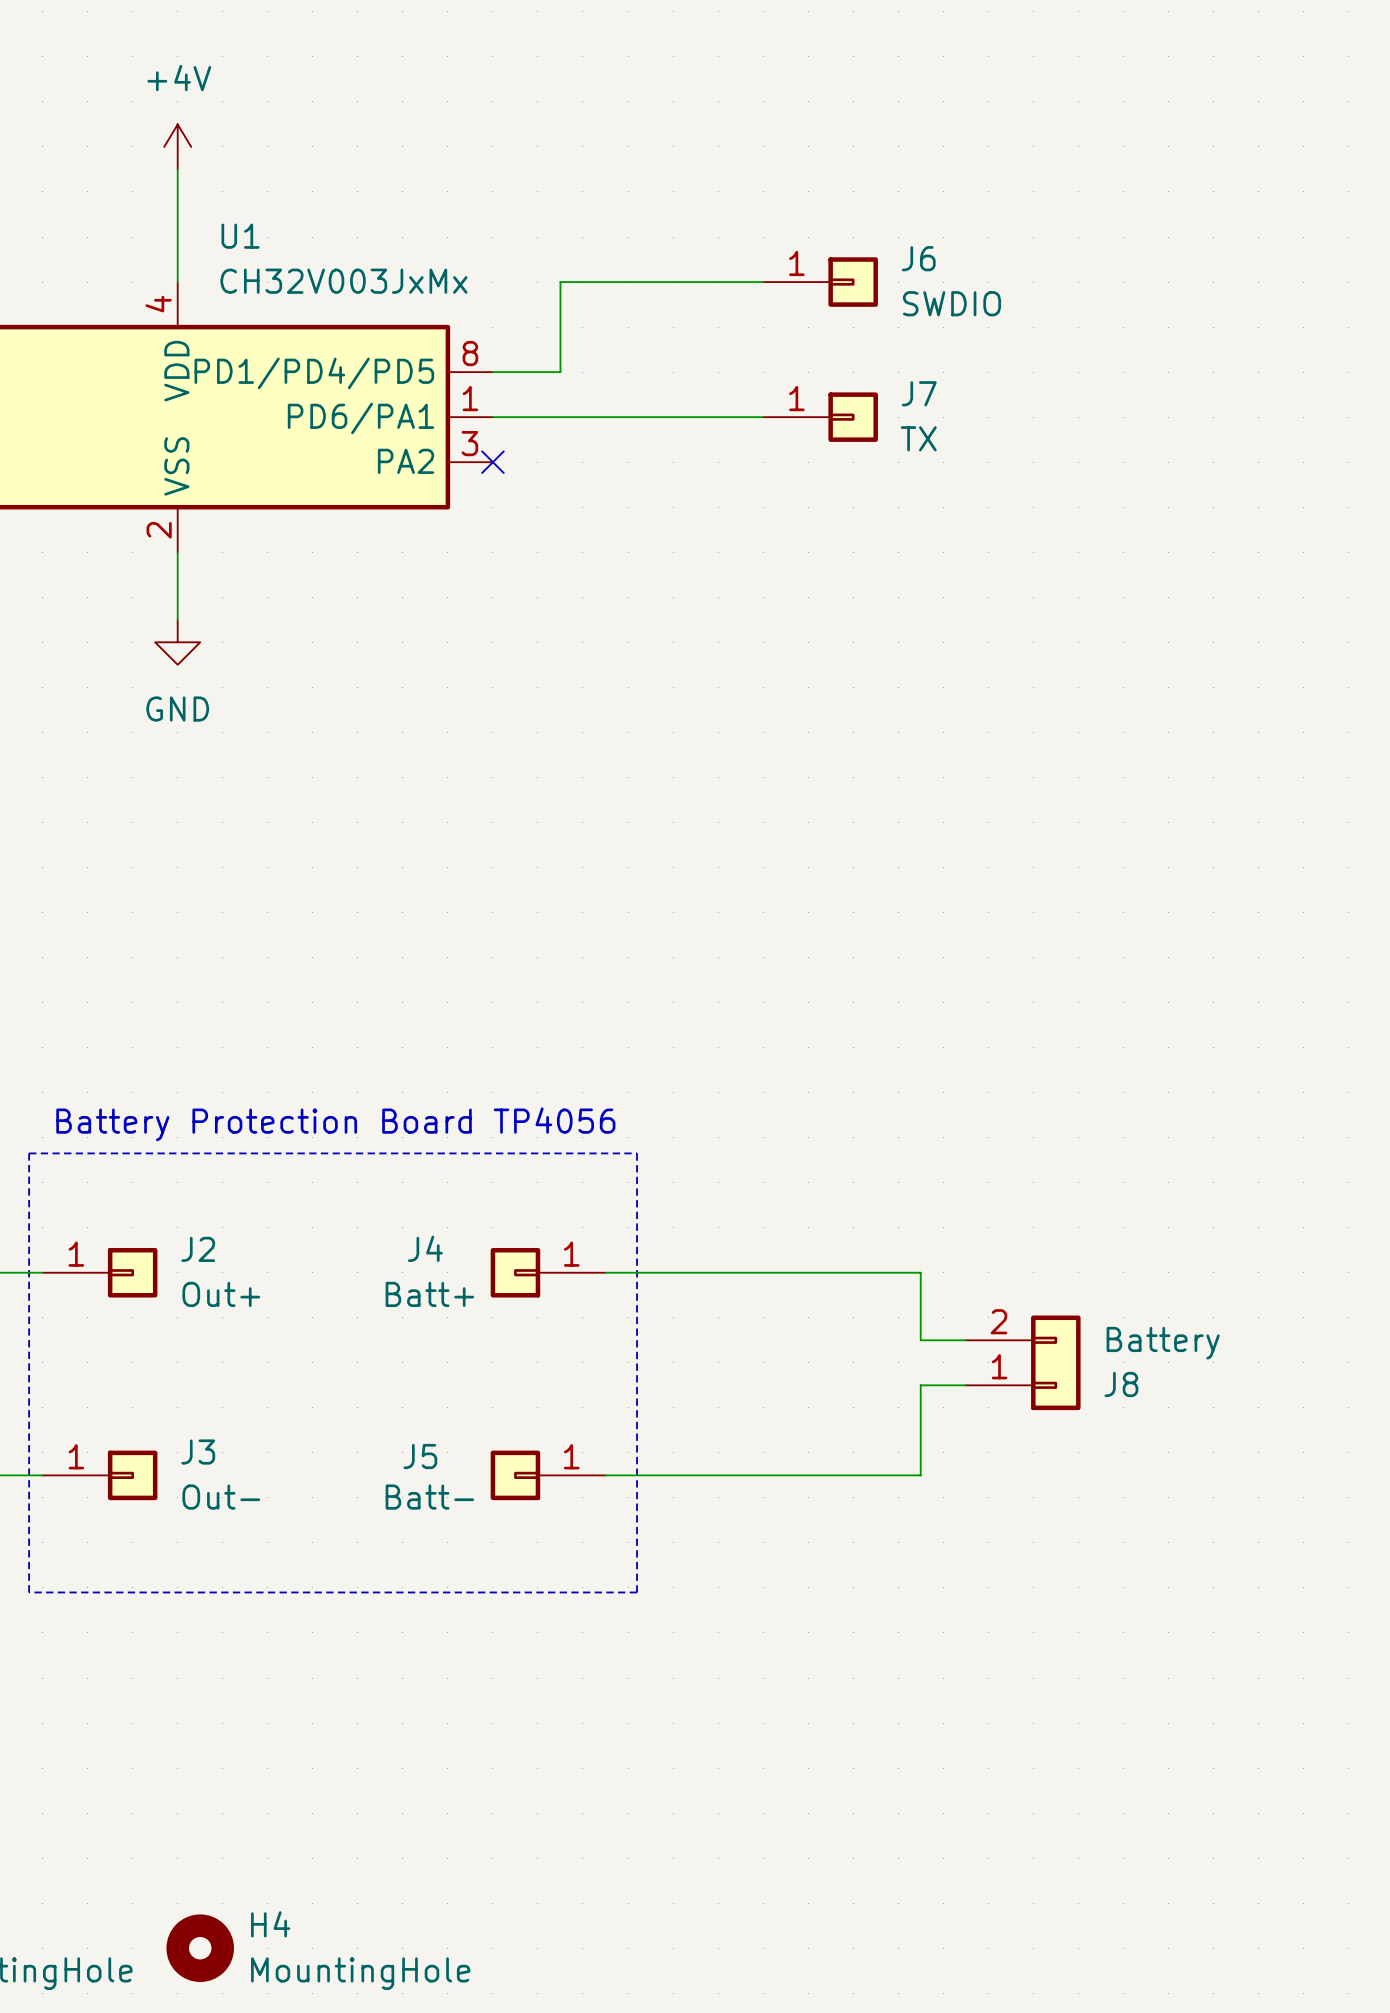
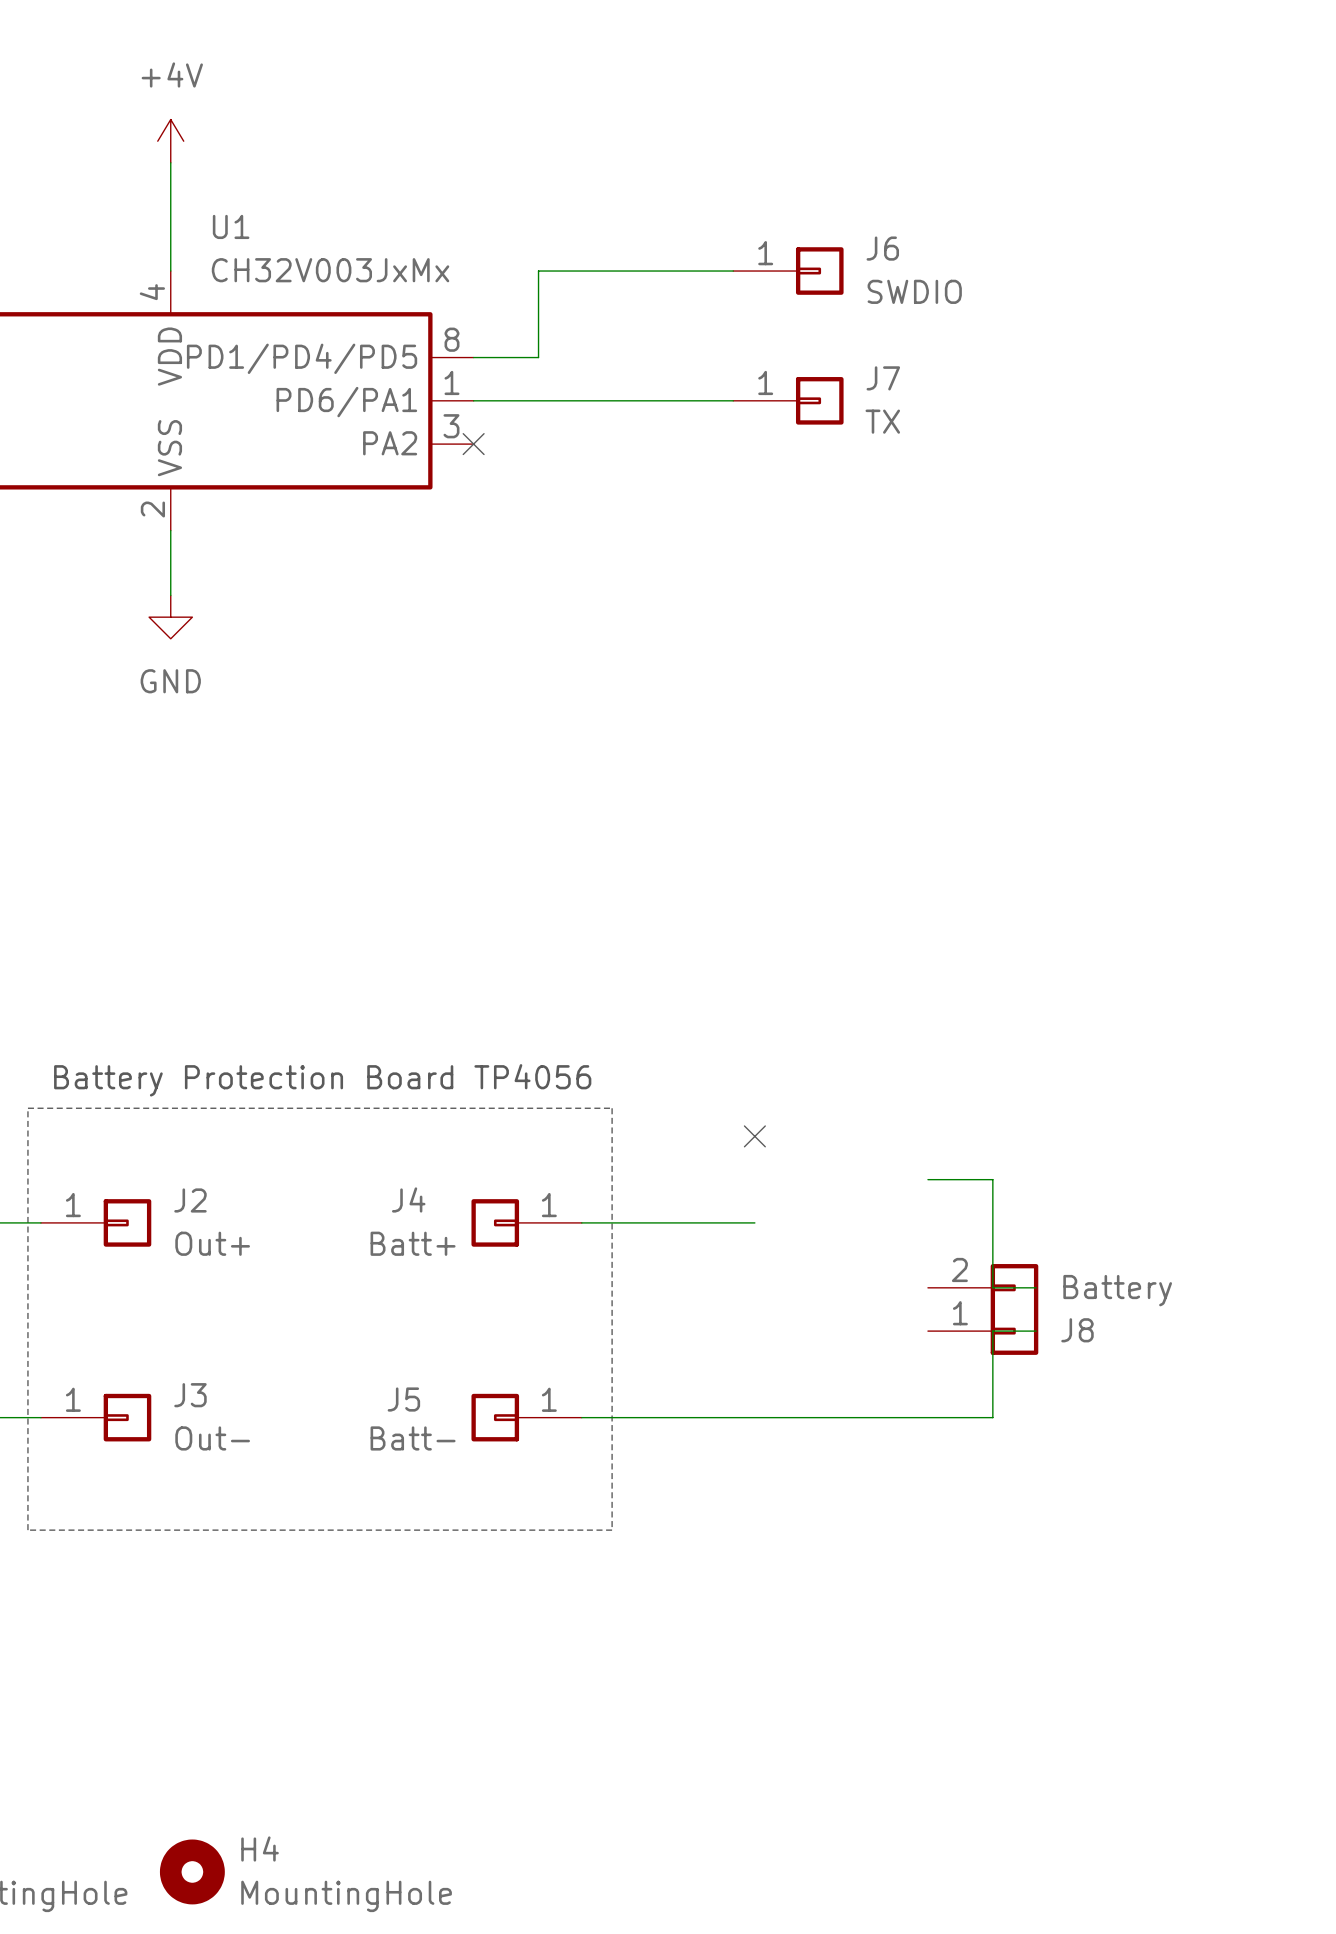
no-connect mark: none -> (754, 1136)
wire: none -> (927, 1179) (992, 1179) (992, 1287) (1036, 1287)
wire: (785, 1272) (920, 1272) (920, 1340) (965, 1340) -> none
wire: (965, 1385) (920, 1385) (920, 1475) -> (1036, 1331) (992, 1331) (992, 1417) (884, 1417)

